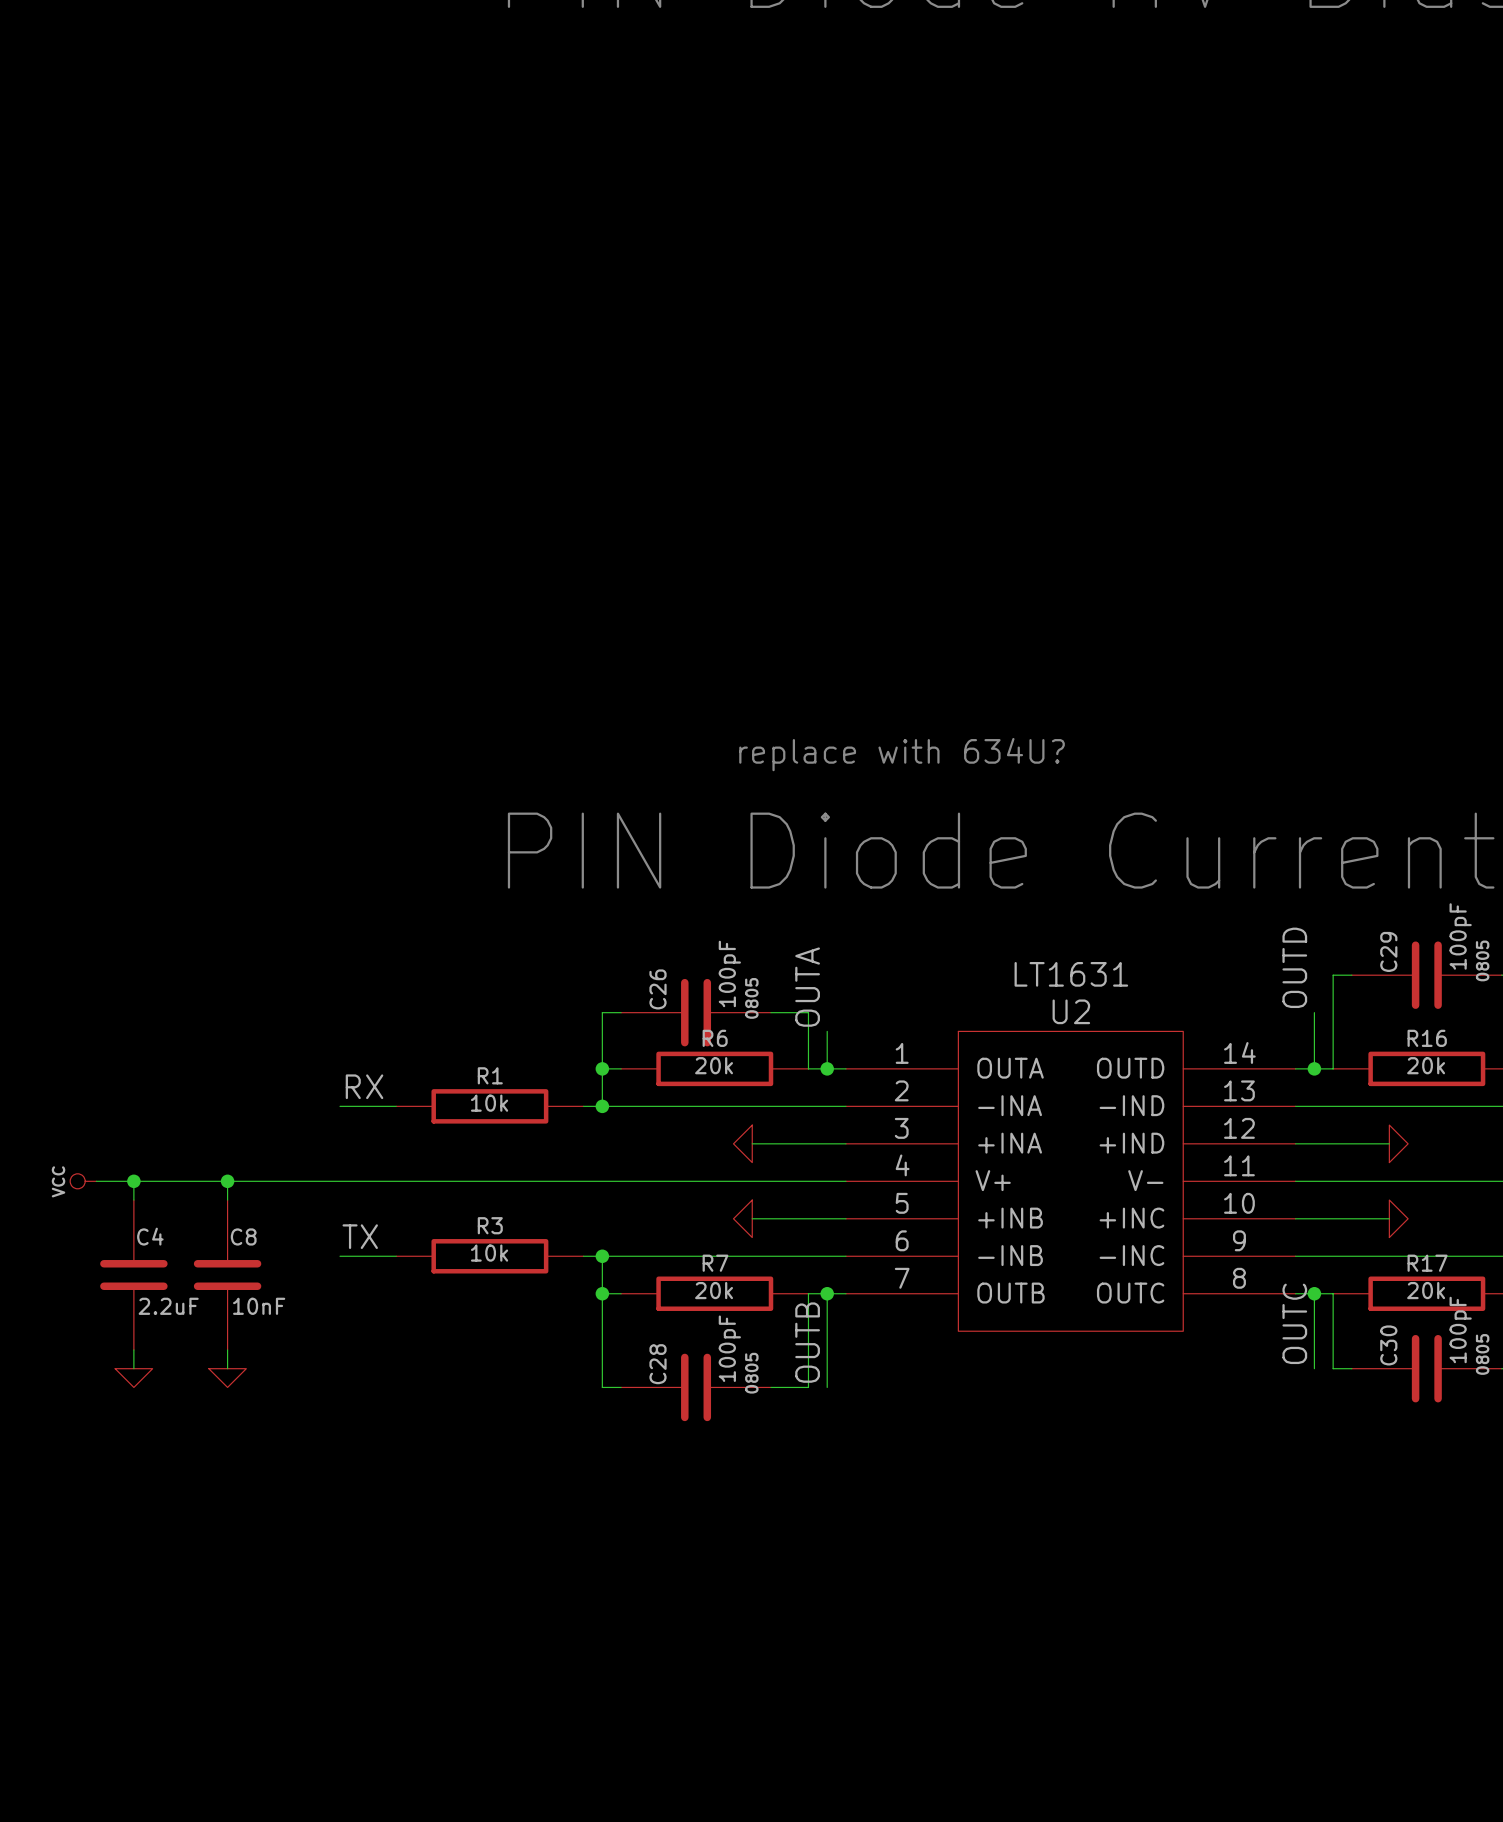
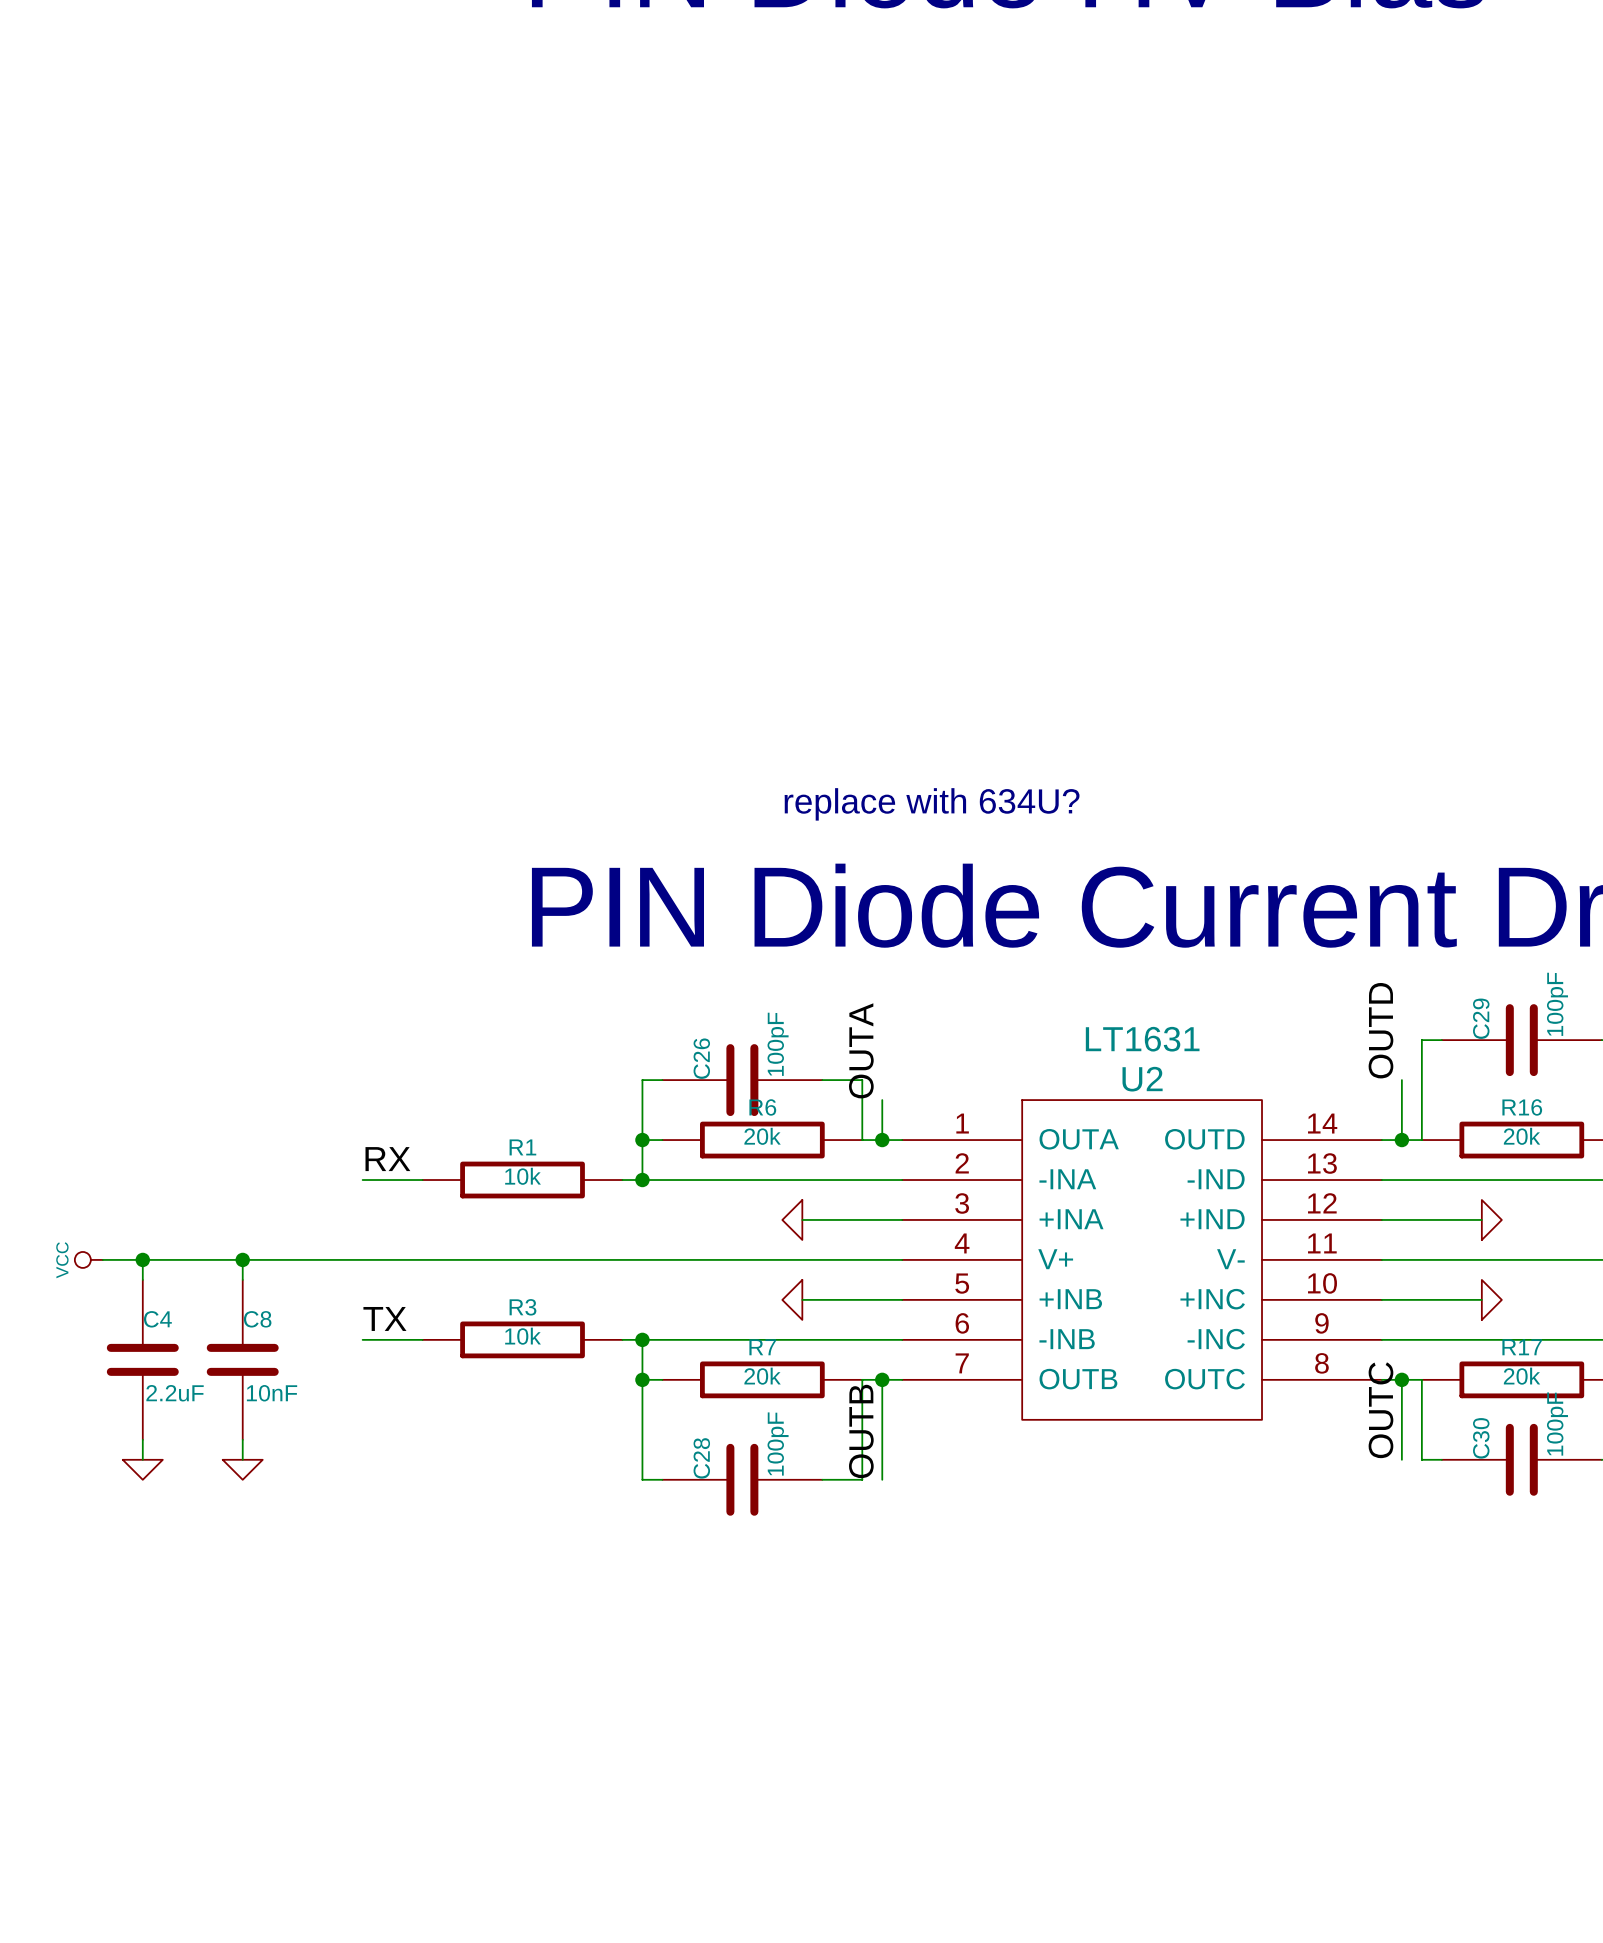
C29 text: 0805 (1482, 960) -> none
C26 text: 0805 (751, 998) -> none
C30 text: 0805 (1482, 1354) -> none
C28 text: 0805 (751, 1373) -> none

